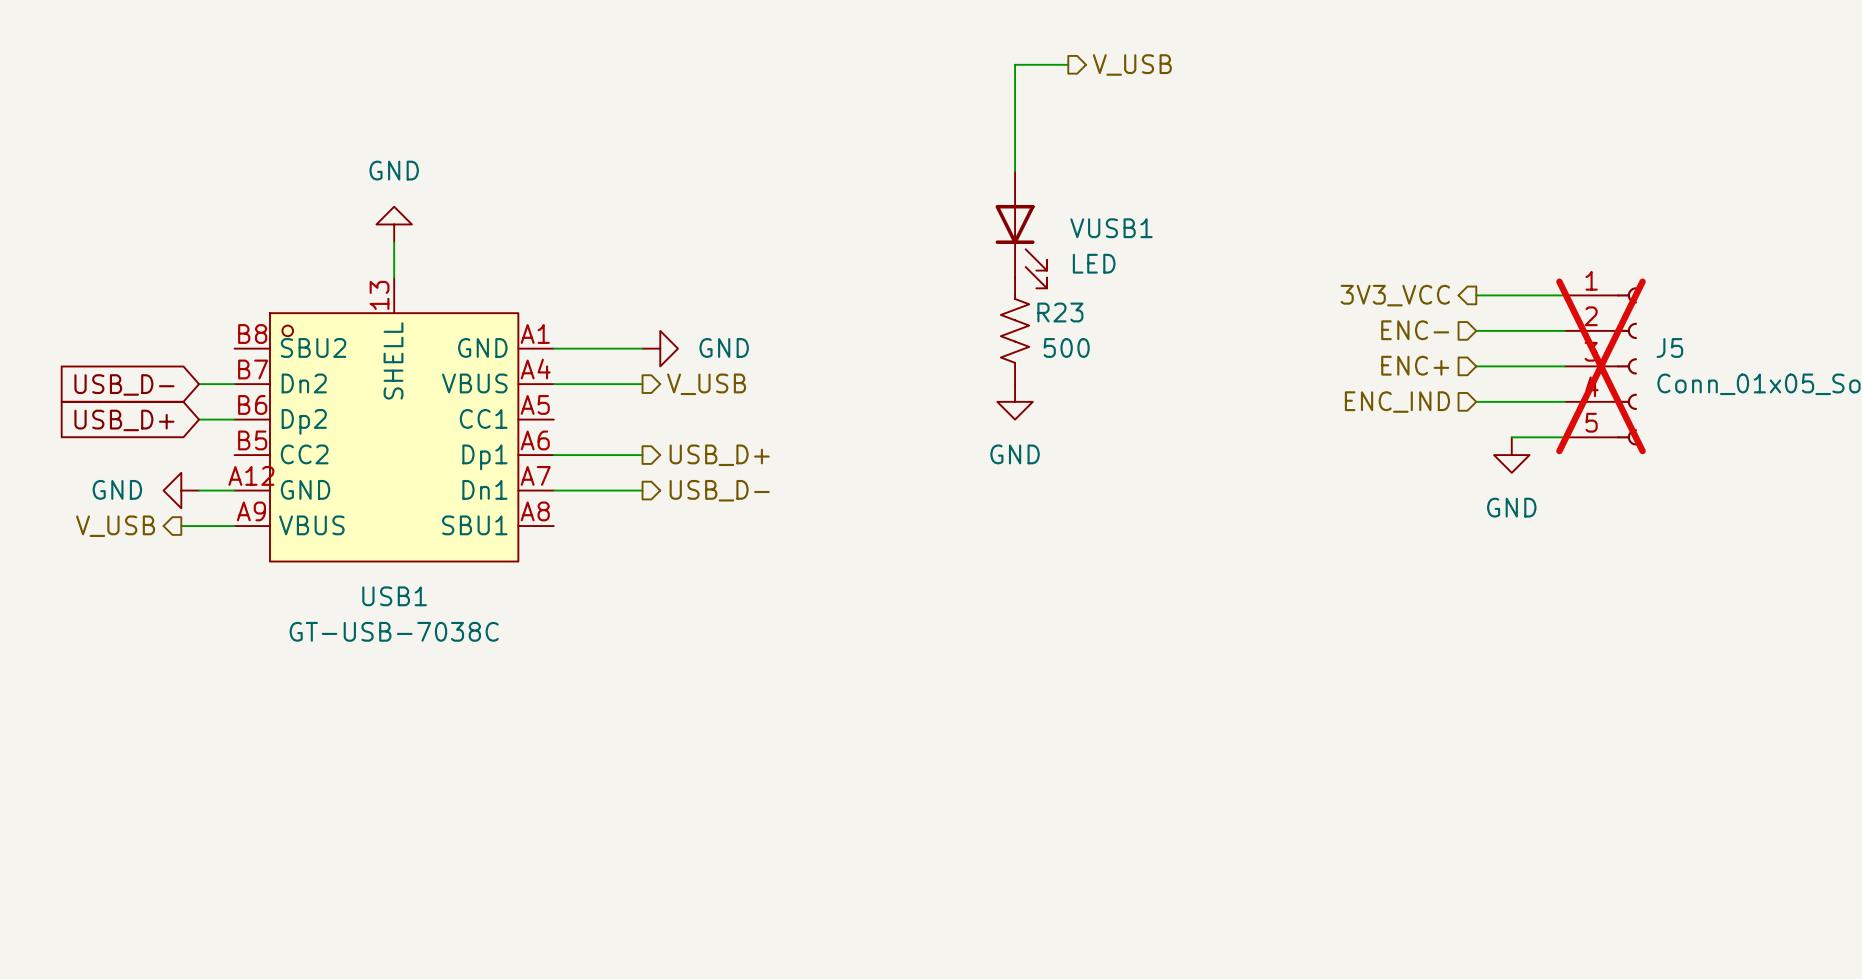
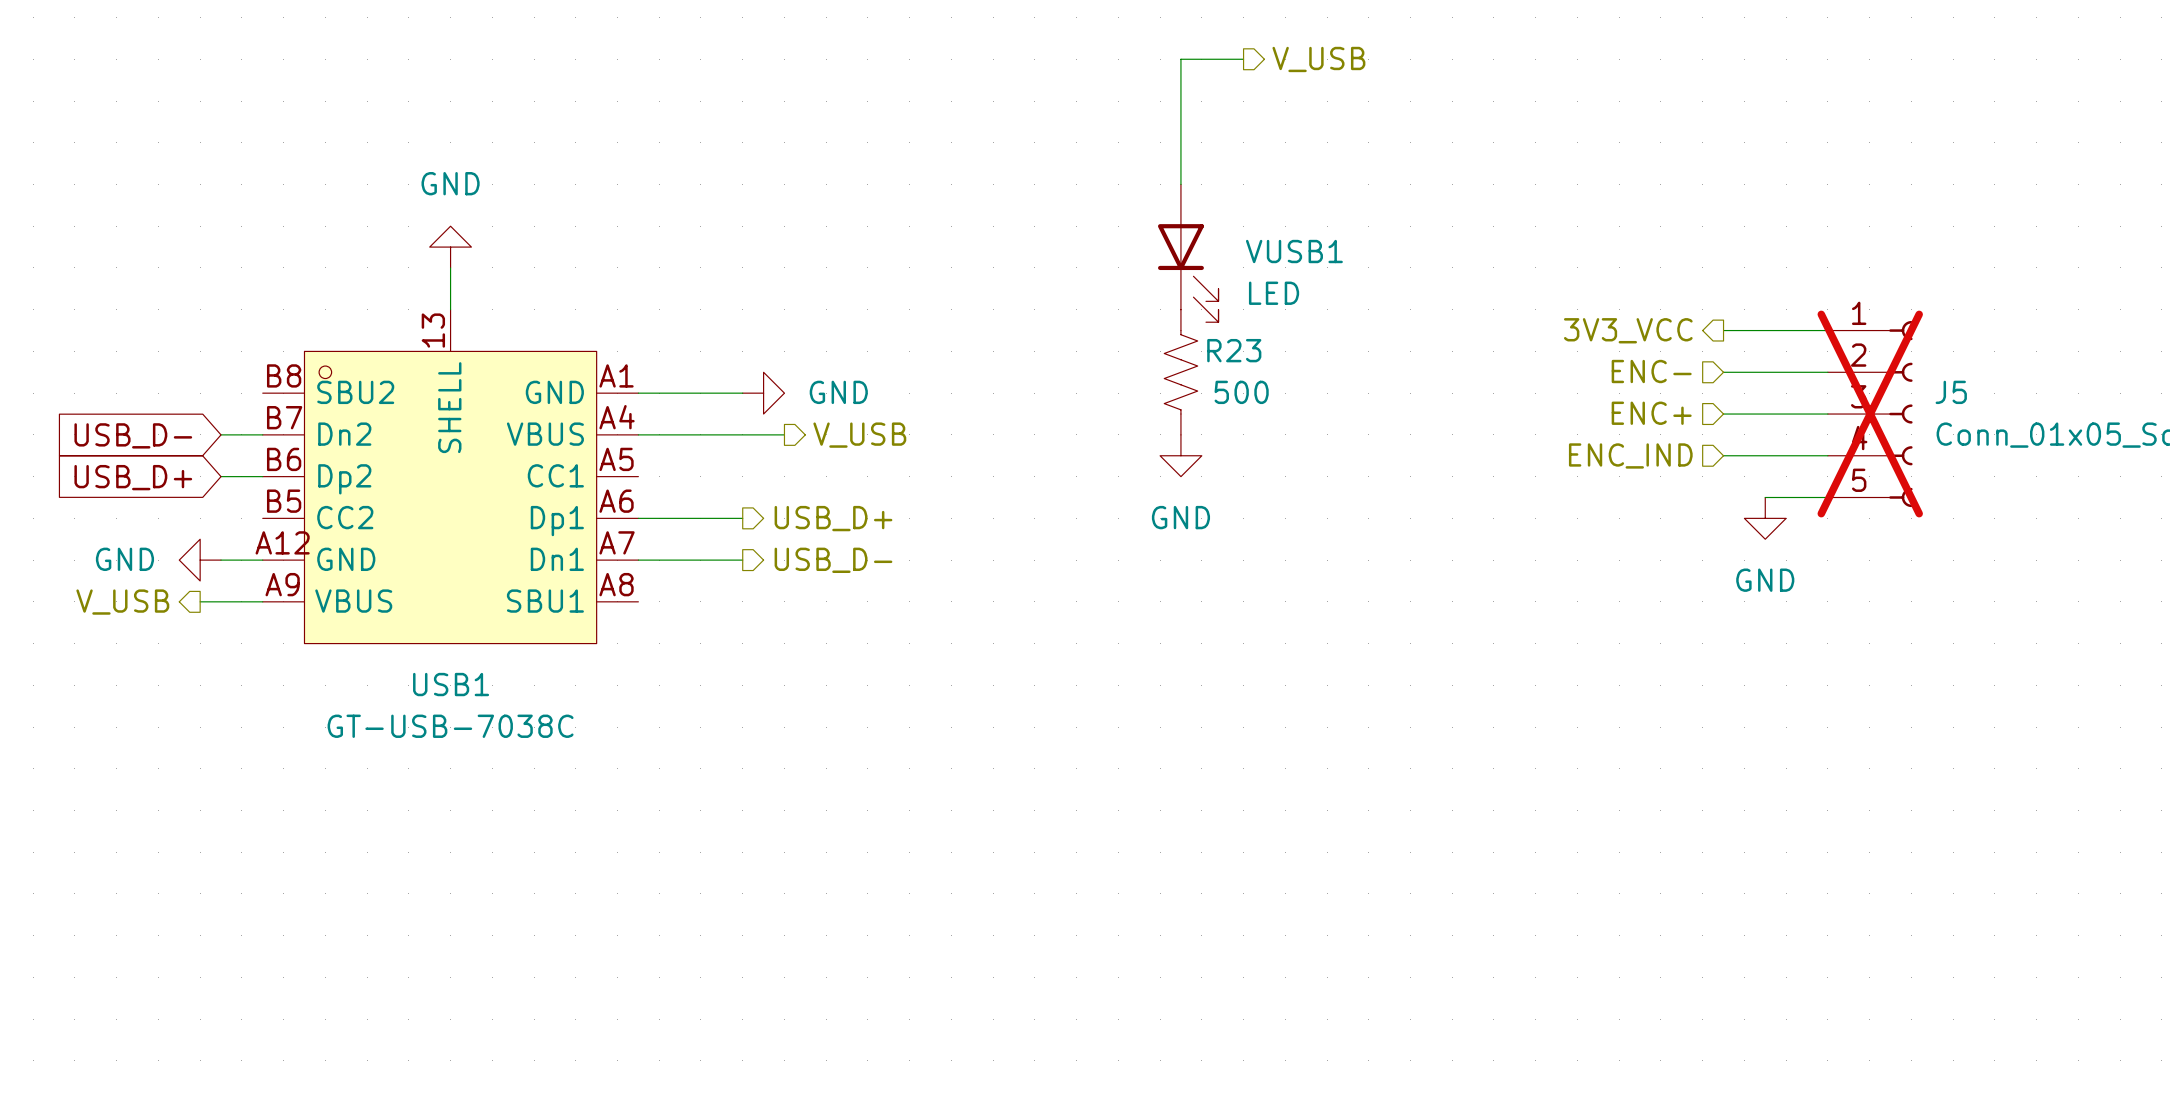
wire: none -> (742, 434) (784, 434)
hierarchical label position: V_USB (706, 384) -> V_USB (859, 435)

